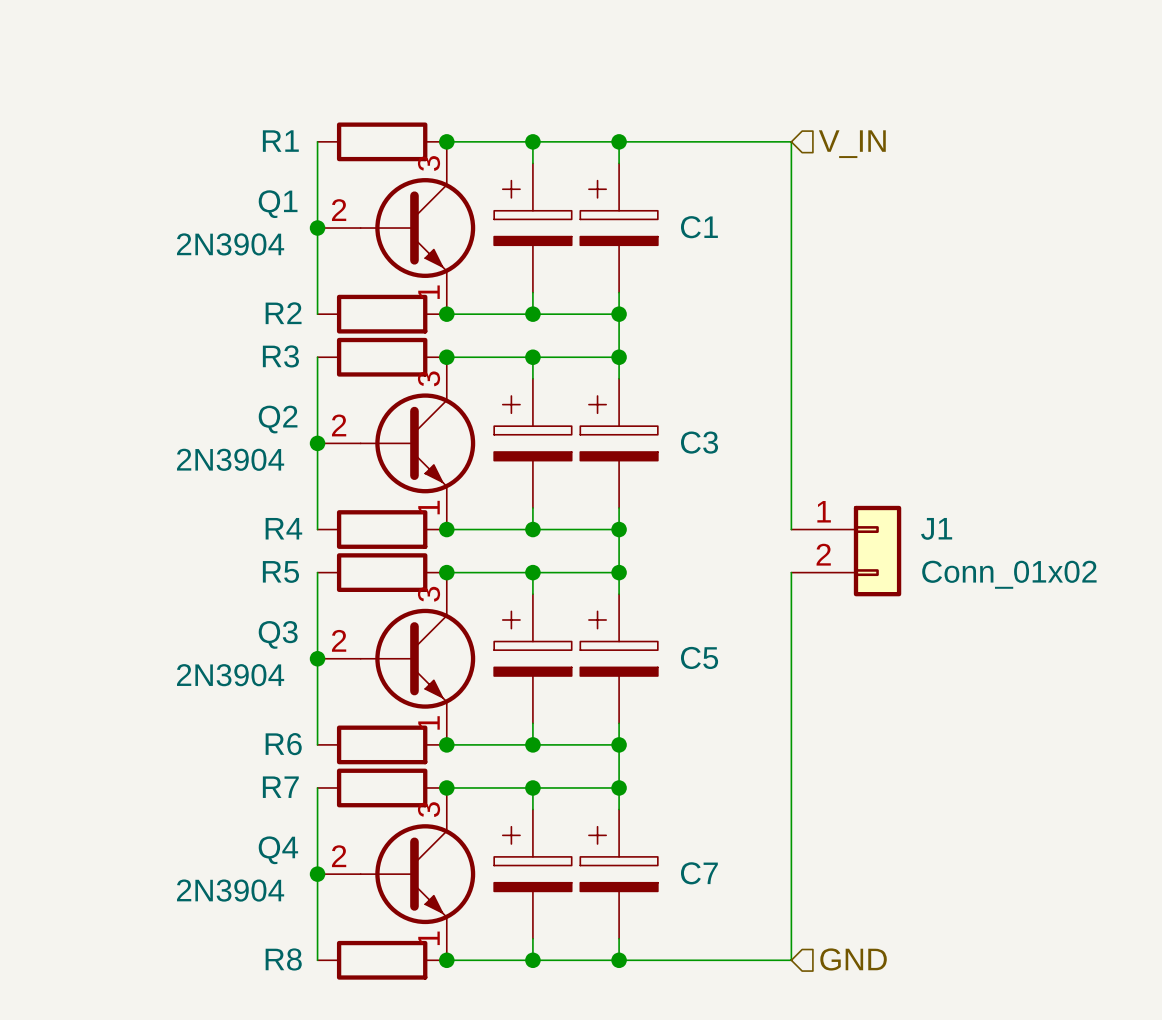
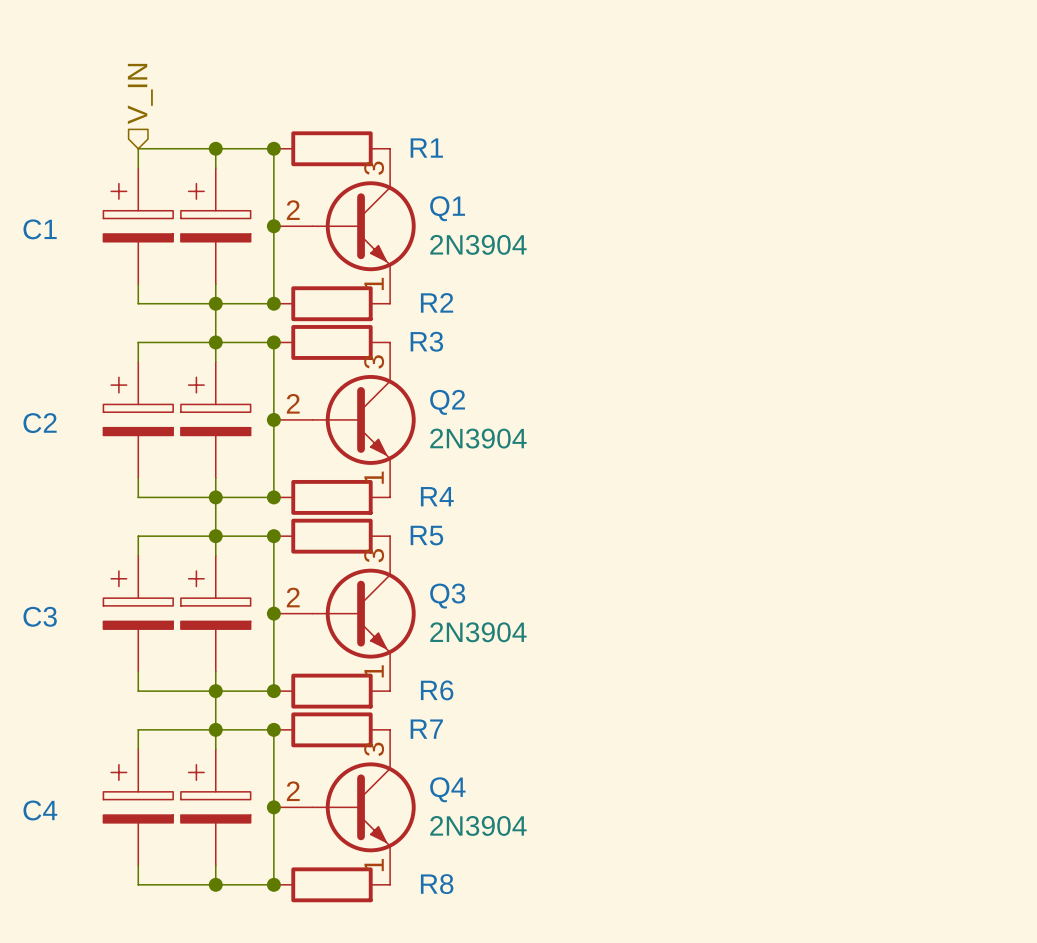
hierarchical label: none -> V_IN (140, 93)
junction: none -> (215, 148)
R1 name position: R1 (280, 141) -> R1 (426, 148)
wire: none -> (273, 148) (138, 148) (138, 168)
junction: none -> (273, 148)
wire: (446, 141) (791, 141) (791, 529) -> none
junction: (446, 141) -> none
wire: (532, 141) (532, 163) -> none
junction: (532, 141) -> none
wire: (619, 141) (619, 163) -> (215, 148) (215, 168)
junction: (619, 141) -> none
hierarchical label: V_IN (852, 144) -> none
Q1 name position: Q1 (278, 204) -> Q1 (447, 208)
C1 name position: C1 (699, 227) -> C1 (40, 229)
part: none -> (215, 226)
C1 position: (532, 228) -> (138, 226)
part: (619, 228) -> none
Q1 value position: 2N3904 (230, 244) -> 2N3904 (478, 244)
wire: none -> (138, 284) (138, 303) (273, 303)
wire: (532, 292) (532, 314) -> none
wire: (619, 292) (619, 378) -> (215, 284) (215, 361)
R2 name position: R2 (283, 313) -> R2 (437, 302)
junction: none -> (215, 303)
junction: none -> (273, 303)
wire: (446, 314) (619, 314) -> none
junction: (446, 314) -> none
junction: (532, 314) -> none
junction: (619, 314) -> none
R3 name position: R3 (280, 356) -> R3 (426, 341)
junction: none -> (215, 342)
wire: none -> (273, 342) (138, 342) (138, 361)
junction: none -> (273, 342)
wire: (446, 357) (619, 357) -> none
junction: (446, 357) -> none
wire: (532, 357) (532, 378) -> none
junction: (532, 357) -> none
junction: (619, 357) -> none
Q2 name position: Q2 (278, 419) -> Q2 (447, 402)
C3 name position: C3 (699, 442) -> C3 (40, 616)
C2: none -> (138, 419)
part: none -> (215, 419)
C3 position: (532, 443) -> (138, 613)
part: (619, 443) -> none
Q2 value position: 2N3904 (230, 459) -> 2N3904 (478, 438)
wire: none -> (138, 478) (138, 497) (273, 497)
wire: (532, 508) (532, 529) -> none
wire: (619, 508) (619, 594) -> (215, 478) (215, 555)
R4 name position: R4 (283, 528) -> R4 (437, 496)
junction: none -> (215, 497)
junction: none -> (273, 497)
wire: (446, 529) (619, 529) -> none
junction: (446, 529) -> none
junction: (532, 529) -> none
junction: (619, 529) -> none
J1: Conn_01x02 (846, 551) -> none
R5 name position: R5 (280, 571) -> R5 (426, 535)
junction: none -> (215, 536)
wire: none -> (273, 536) (138, 536) (138, 555)
junction: none -> (273, 536)
wire: (446, 572) (619, 572) -> none
junction: (446, 572) -> none
wire: (532, 572) (532, 594) -> none
junction: (532, 572) -> none
junction: (619, 572) -> none
wire: (791, 572) (791, 960) (446, 960) -> none
Q3 name position: Q3 (278, 634) -> Q3 (447, 596)
part: none -> (215, 613)
C5: (532, 658) -> none
part: (619, 658) -> none
Q3 value position: 2N3904 (230, 675) -> 2N3904 (478, 632)
wire: none -> (138, 671) (138, 691) (273, 691)
wire: (532, 723) (532, 744) -> none
wire: (619, 723) (619, 809) -> (215, 671) (215, 749)
junction: none -> (215, 691)
R6 name position: R6 (283, 744) -> R6 (437, 690)
junction: none -> (273, 691)
wire: (446, 744) (619, 744) -> none
junction: (446, 744) -> none
junction: (532, 744) -> none
junction: (619, 744) -> none
junction: none -> (215, 729)
R7 name position: R7 (280, 787) -> R7 (426, 729)
wire: none -> (273, 729) (138, 729) (138, 749)
junction: none -> (273, 729)
wire: (446, 787) (619, 787) -> none
junction: (446, 787) -> none
wire: (532, 787) (532, 809) -> none
junction: (532, 787) -> none
junction: (619, 787) -> none
Q4 name position: Q4 (278, 850) -> Q4 (447, 789)
C4: none -> (138, 807)
part: none -> (215, 807)
C7: (532, 874) -> none
part: (619, 874) -> none
Q4 value position: 2N3904 (230, 890) -> 2N3904 (478, 825)
wire: none -> (138, 865) (138, 884) (273, 884)
wire: (532, 938) (532, 960) -> none
wire: (619, 938) (619, 960) -> (215, 865) (215, 884)
R8 name position: R8 (283, 959) -> R8 (437, 884)
hierarchical label: GND (853, 959) -> none
junction: none -> (215, 884)
junction: none -> (273, 884)
junction: (446, 960) -> none
junction: (532, 960) -> none
junction: (619, 960) -> none

